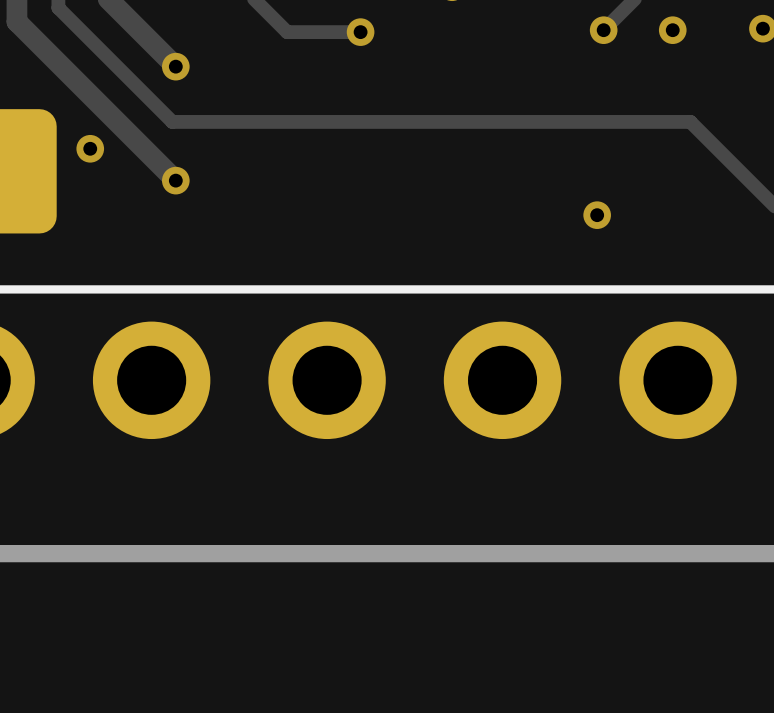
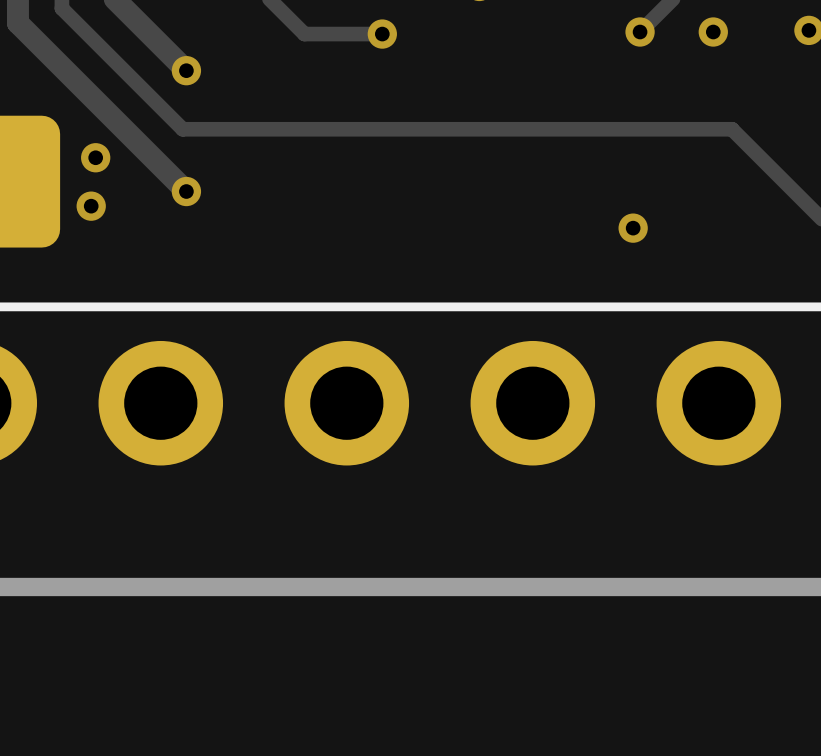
via: none -> (91, 206)

